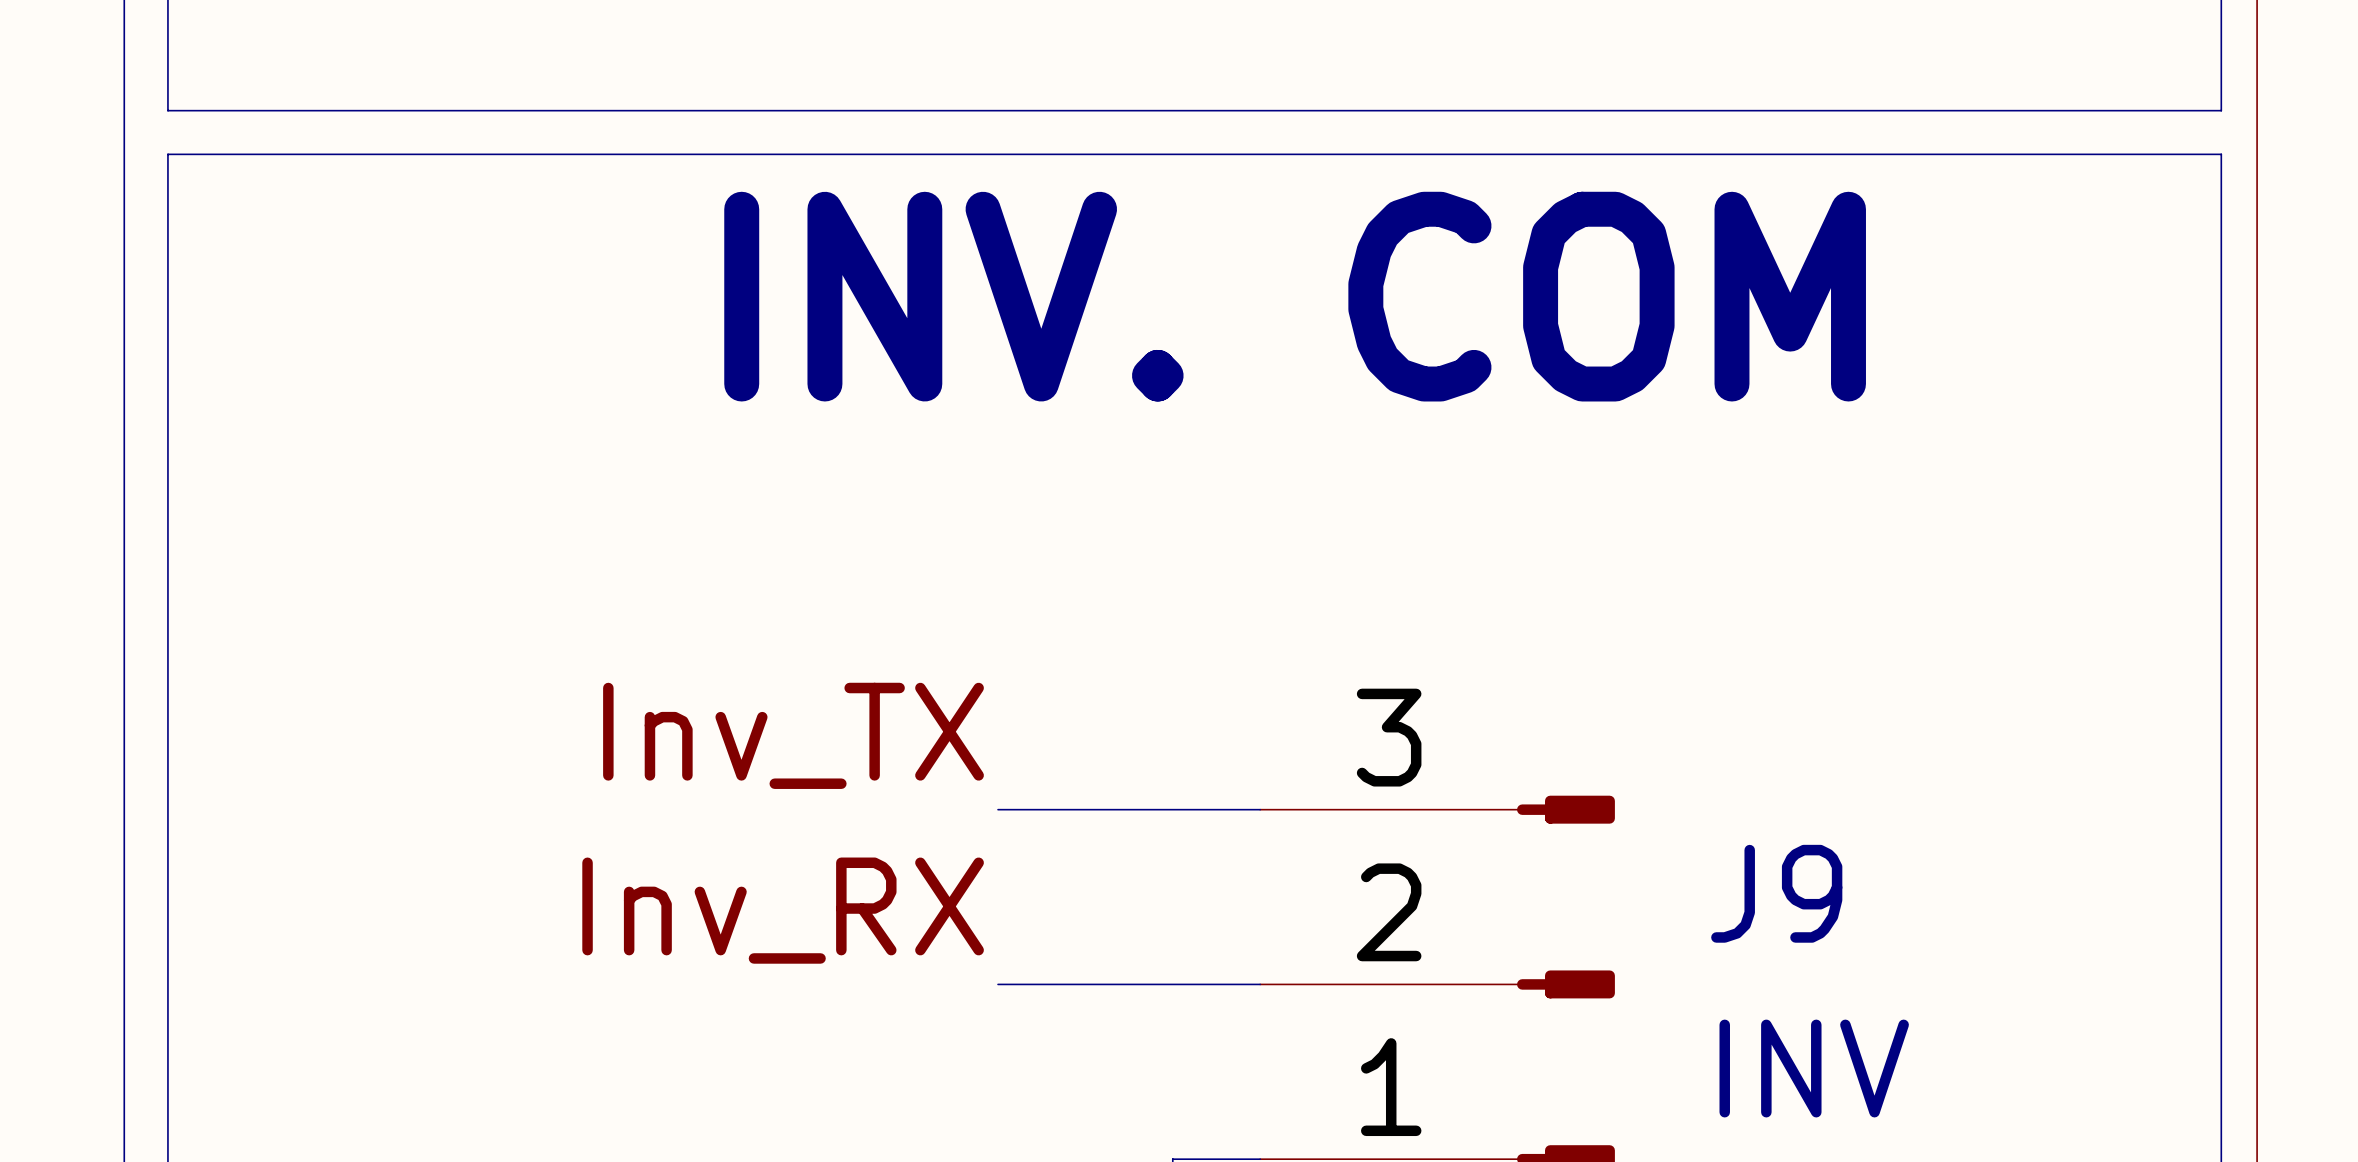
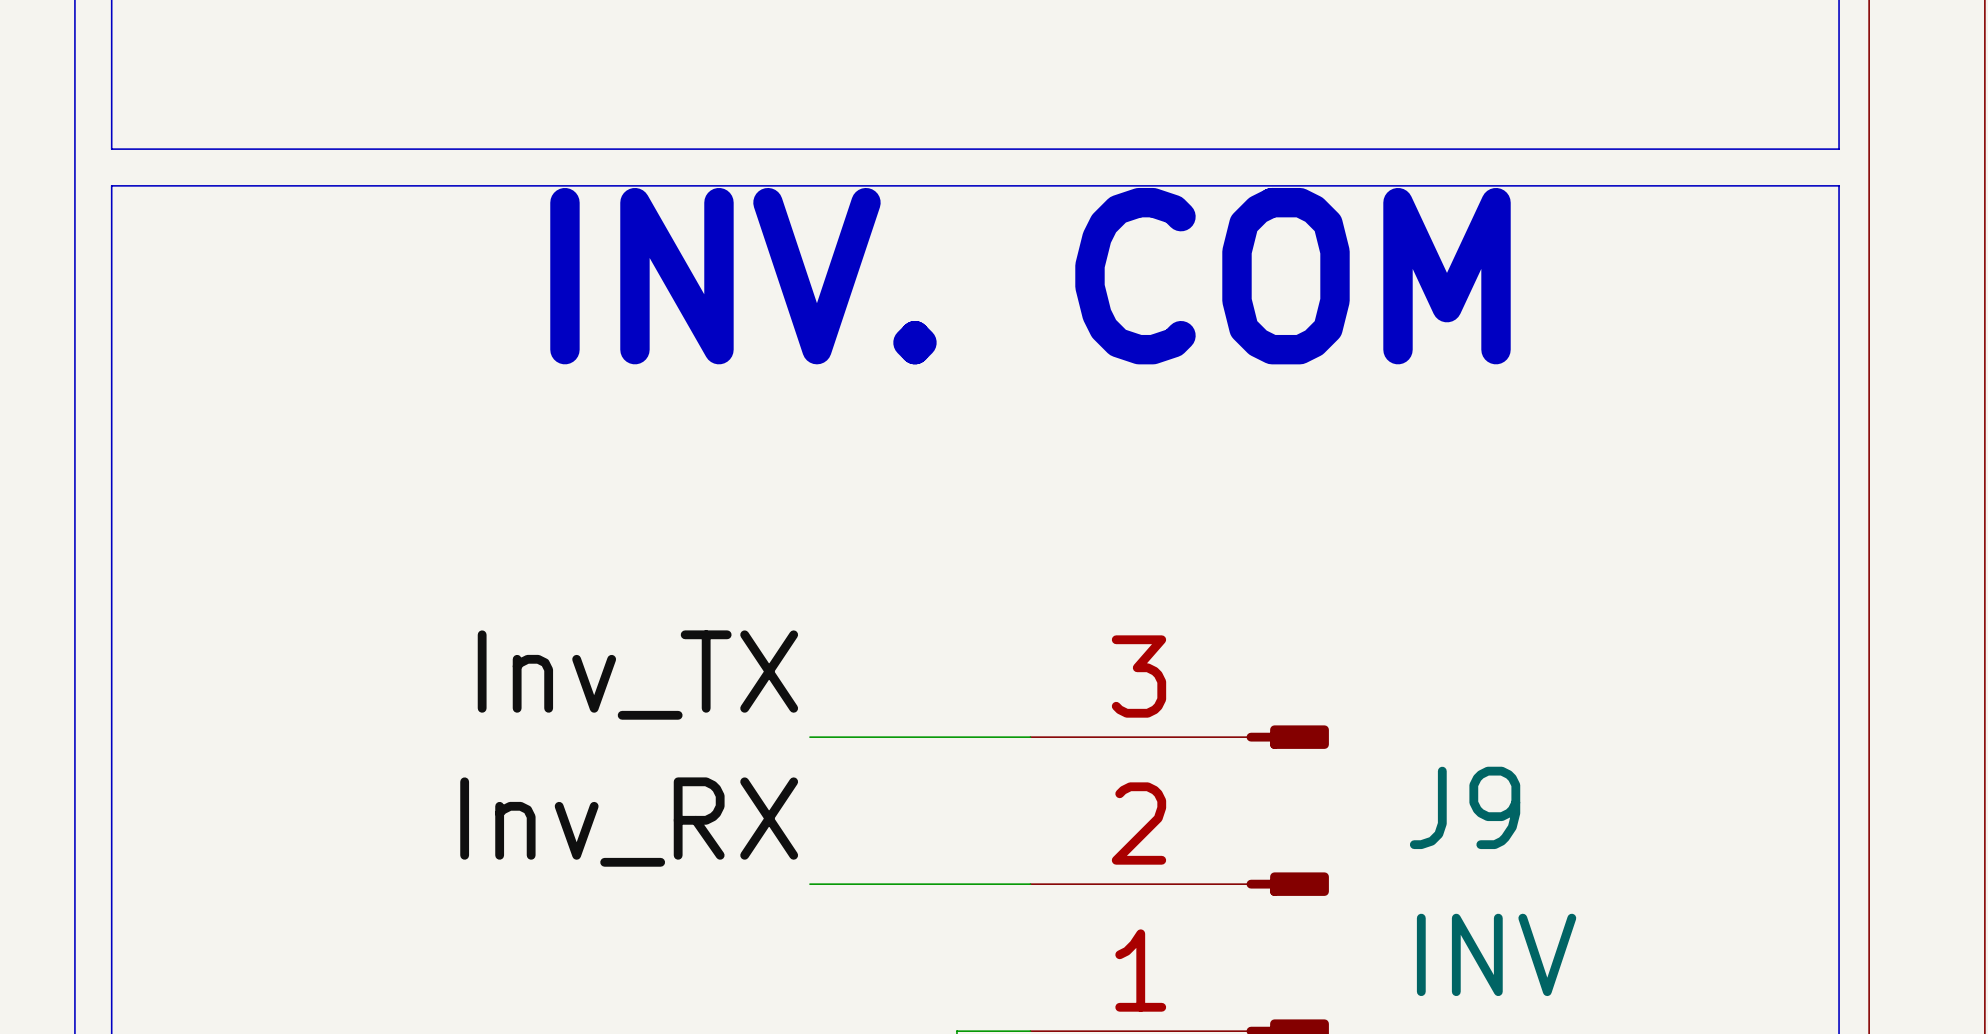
text position: INV. COM (1295, 296) -> INV. COM (1030, 276)

